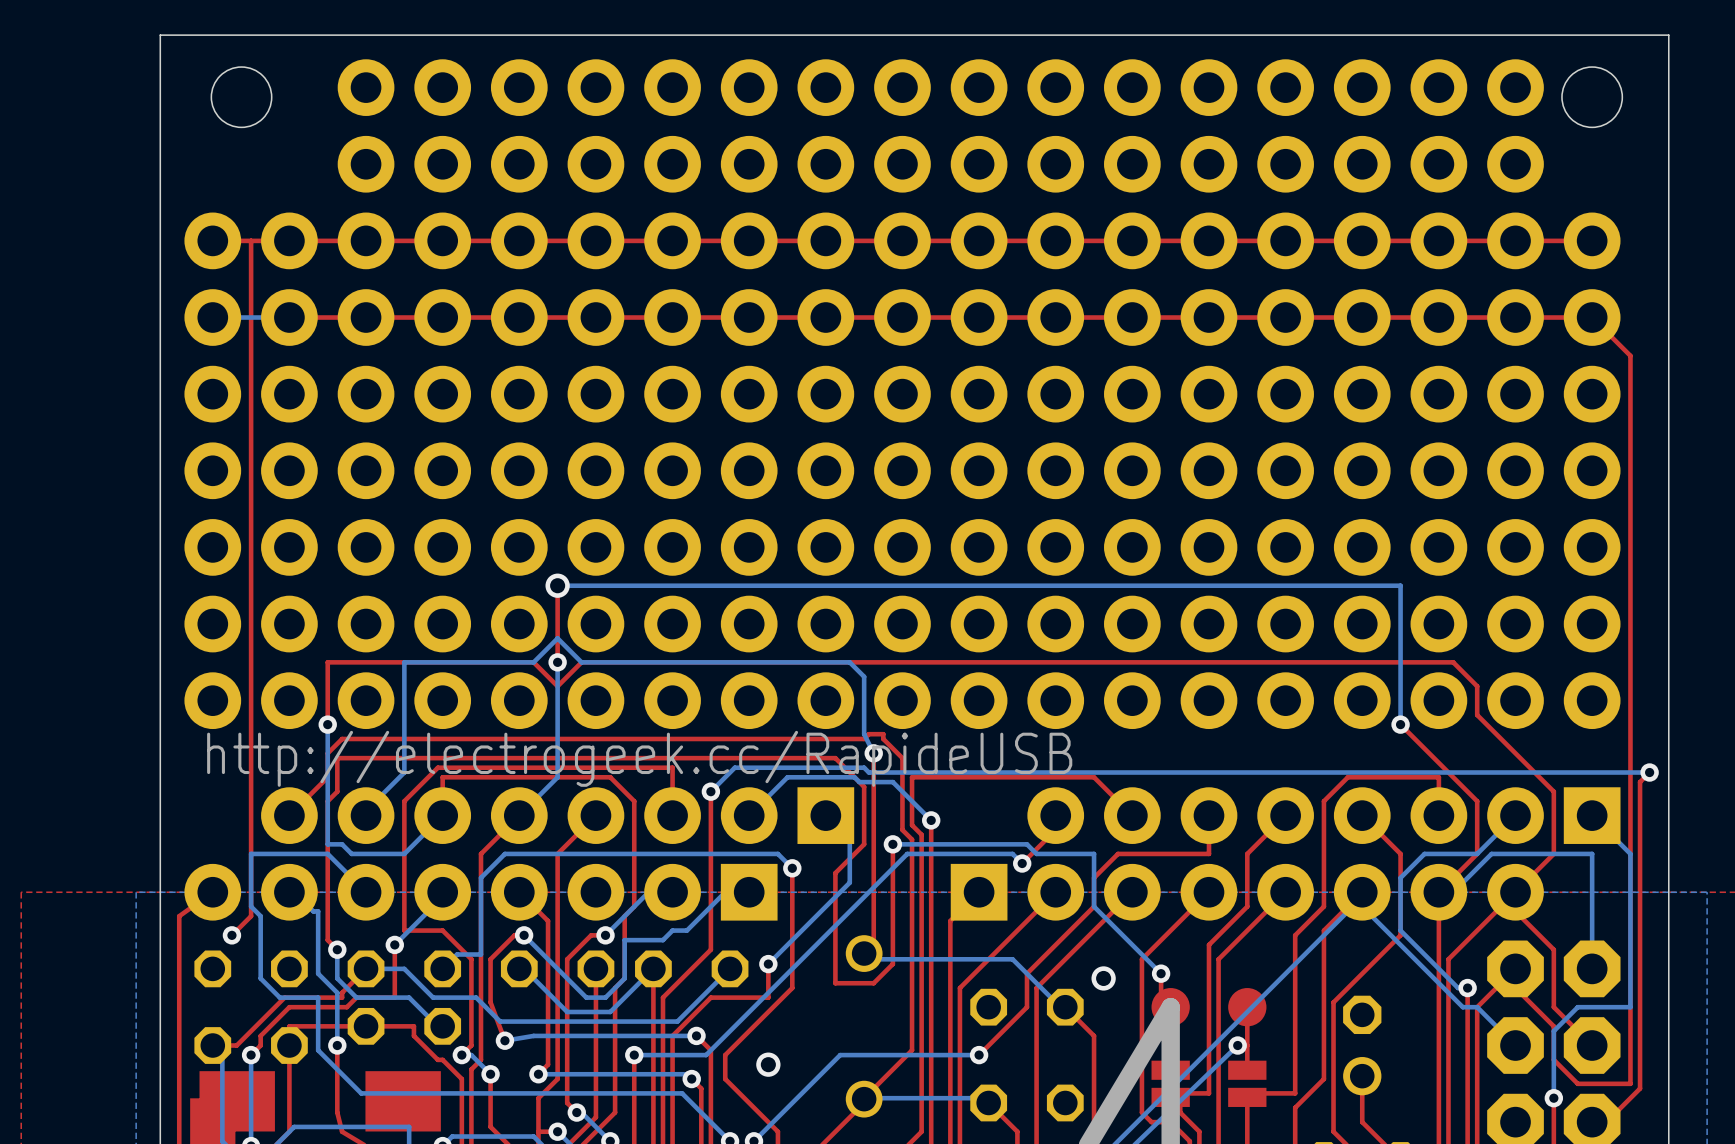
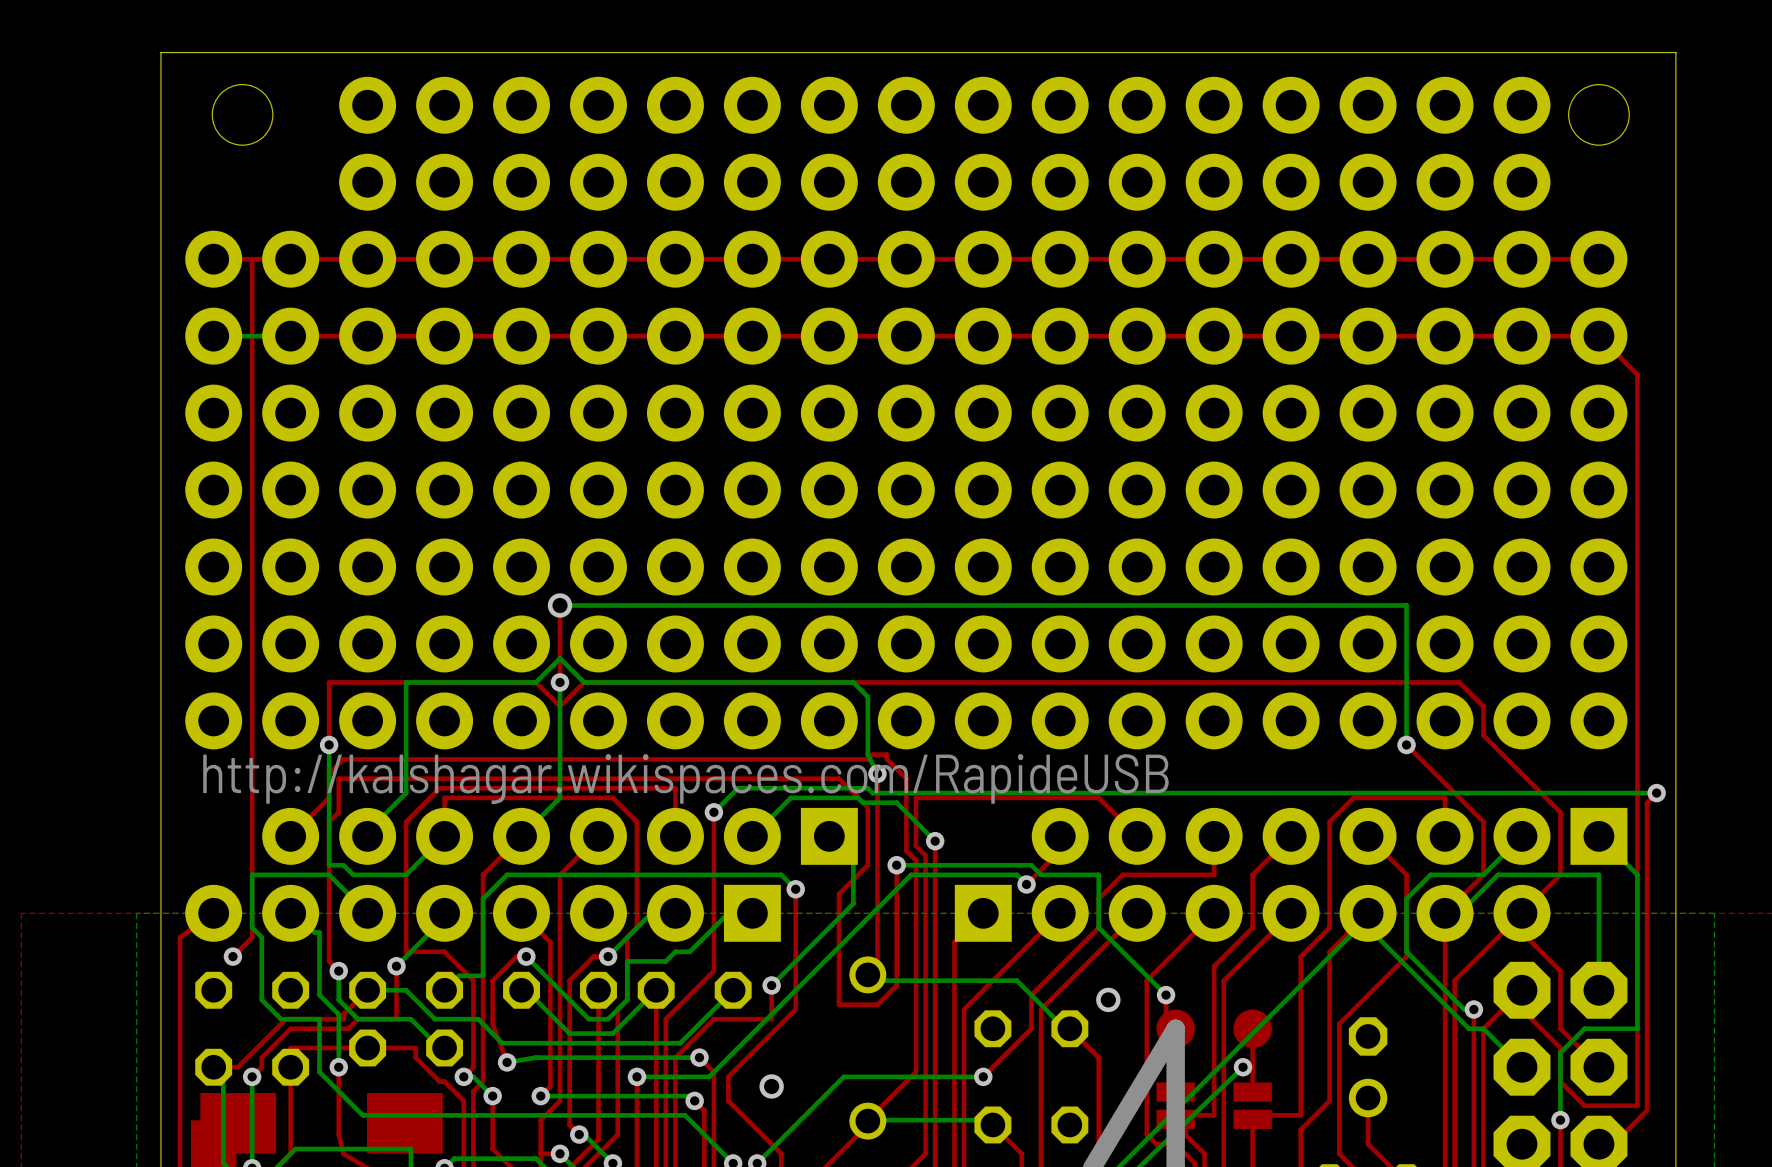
text: http://electrogeek.cc/RapideUSB (639, 758) -> http://kalshagar.wikispaces.com/RapideUSB (685, 779)

